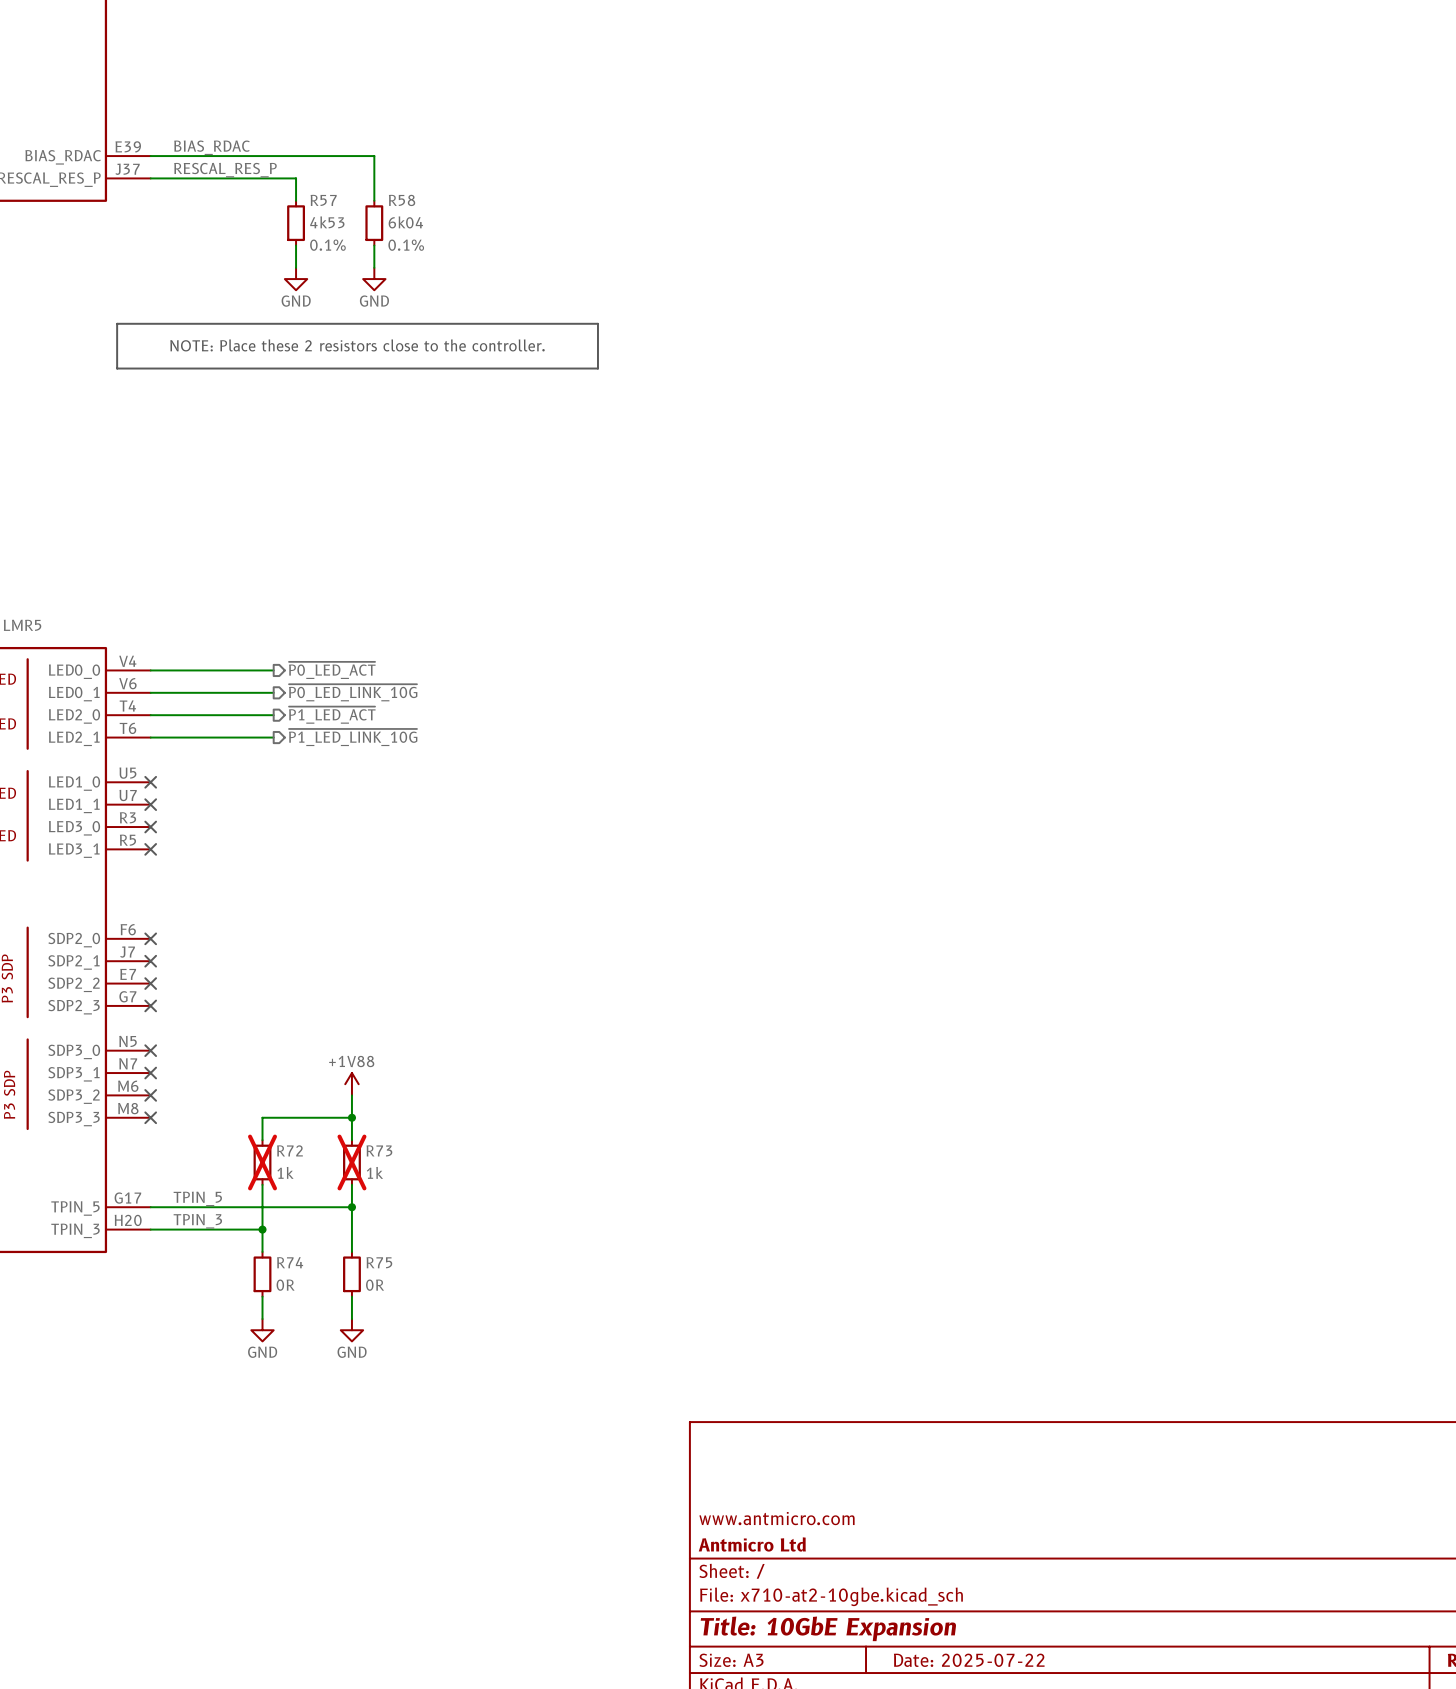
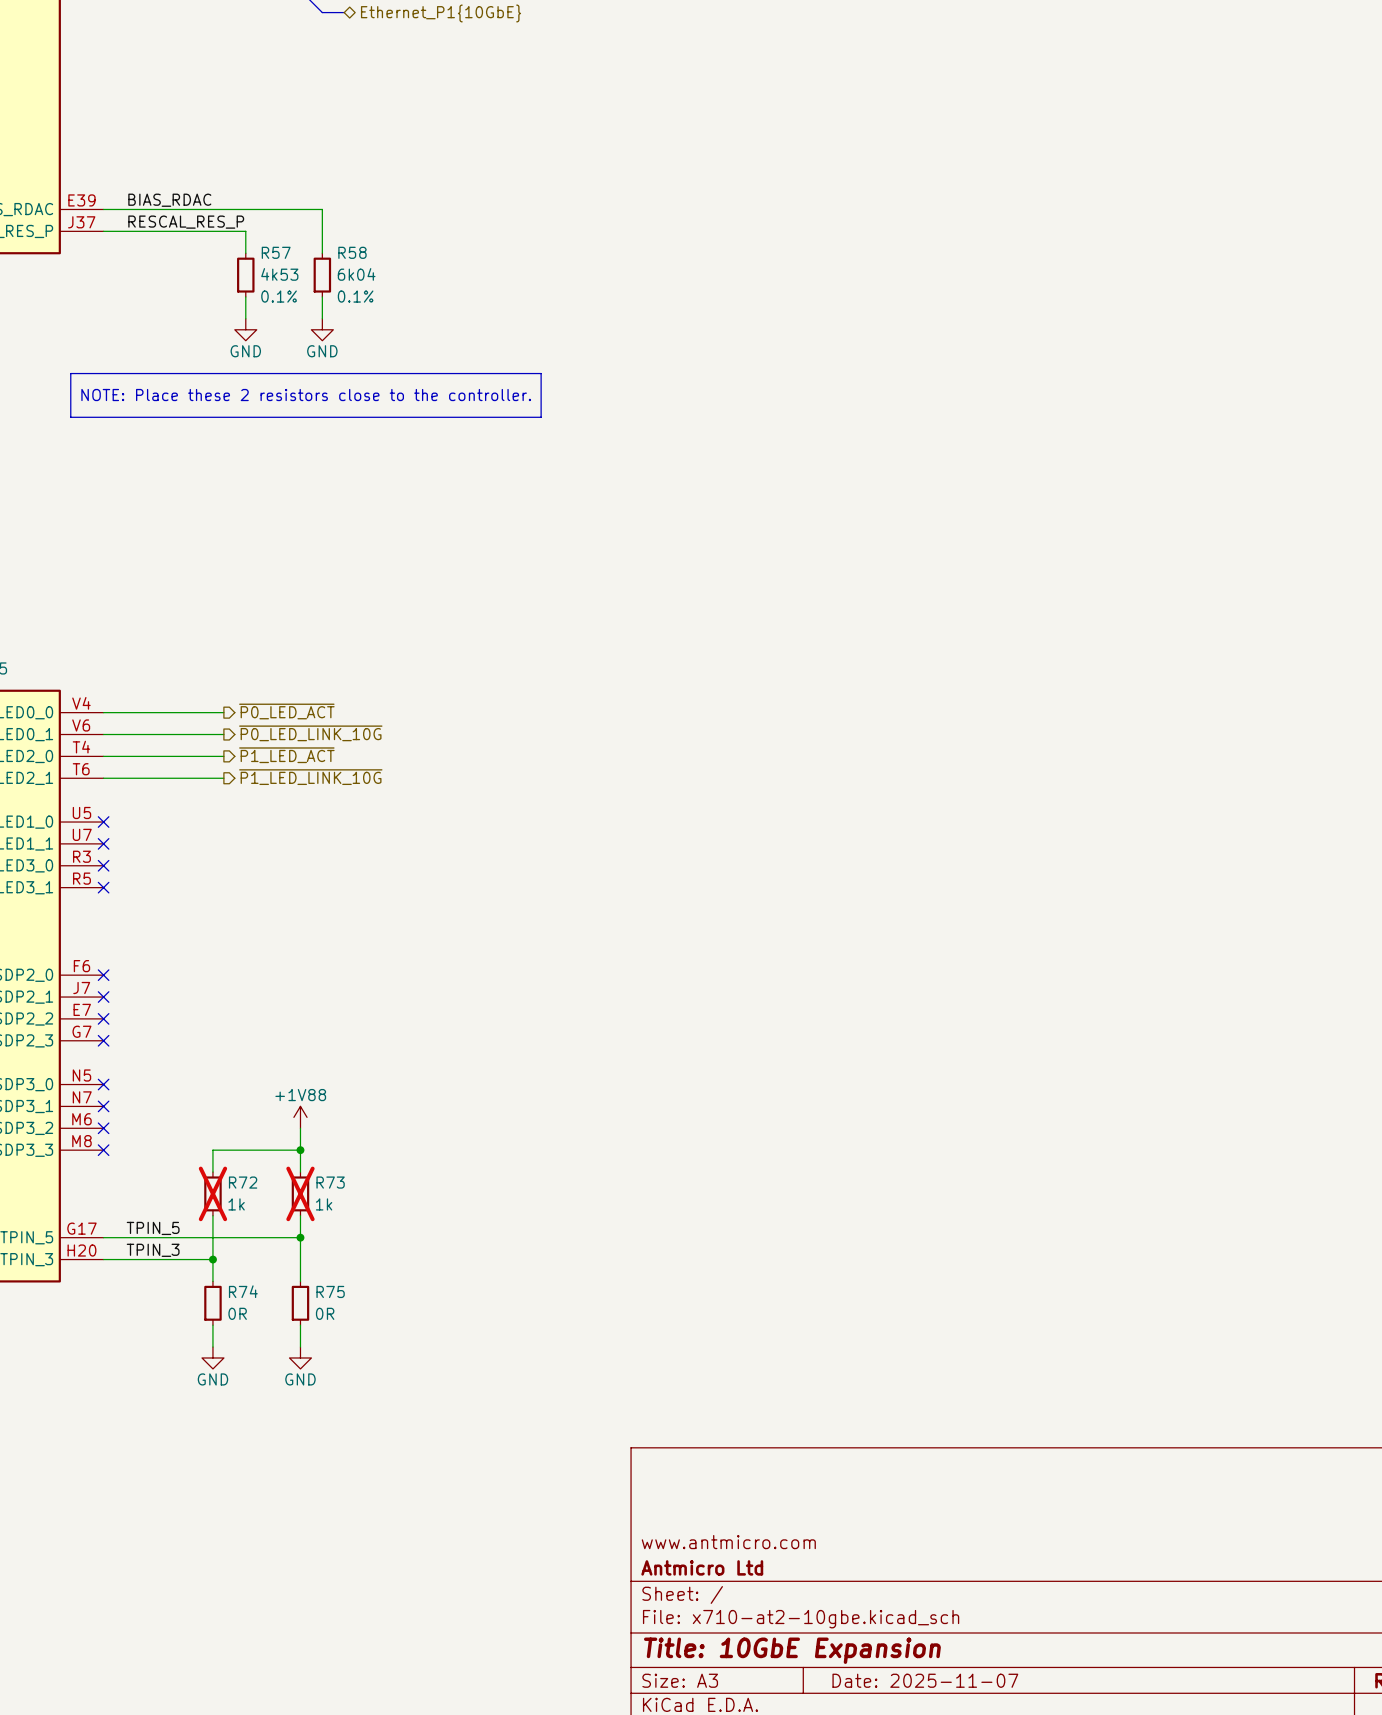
title block: Date: 2025-07-22 (969, 1660) -> Date: 2025-11-07 (925, 1680)

